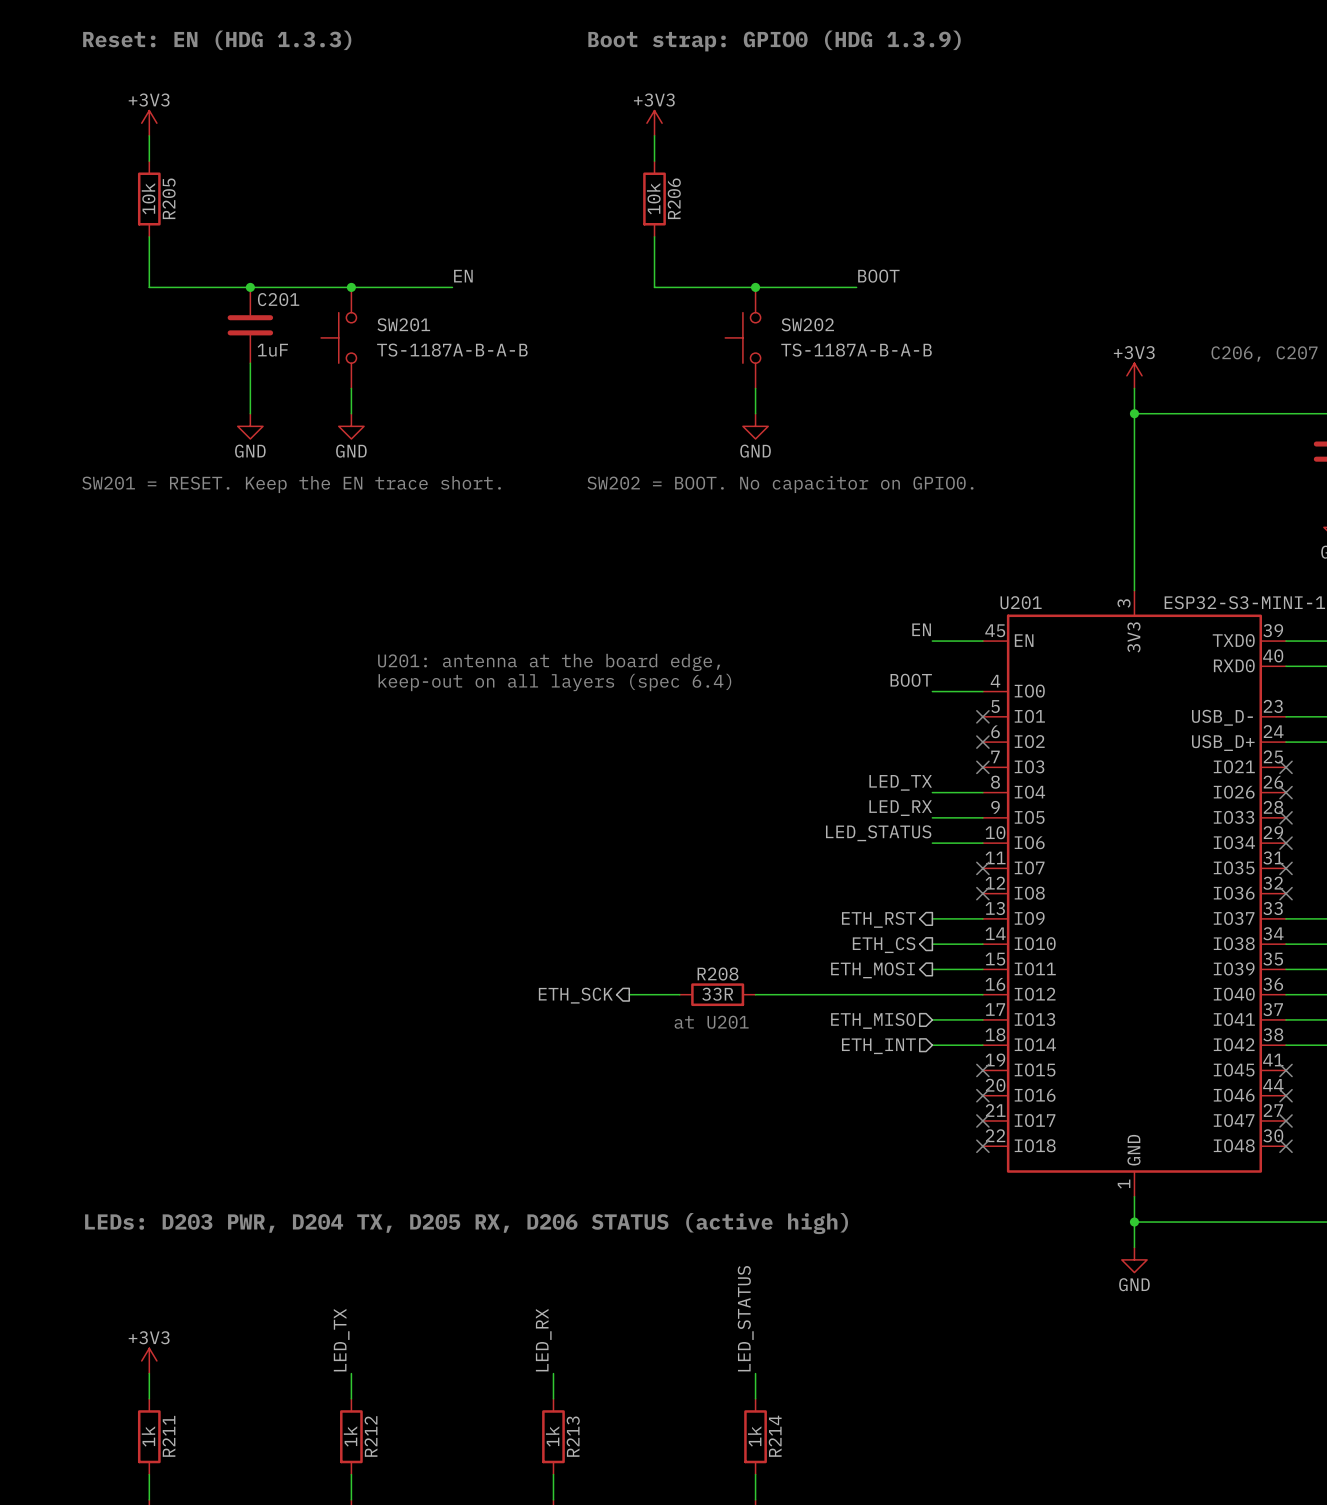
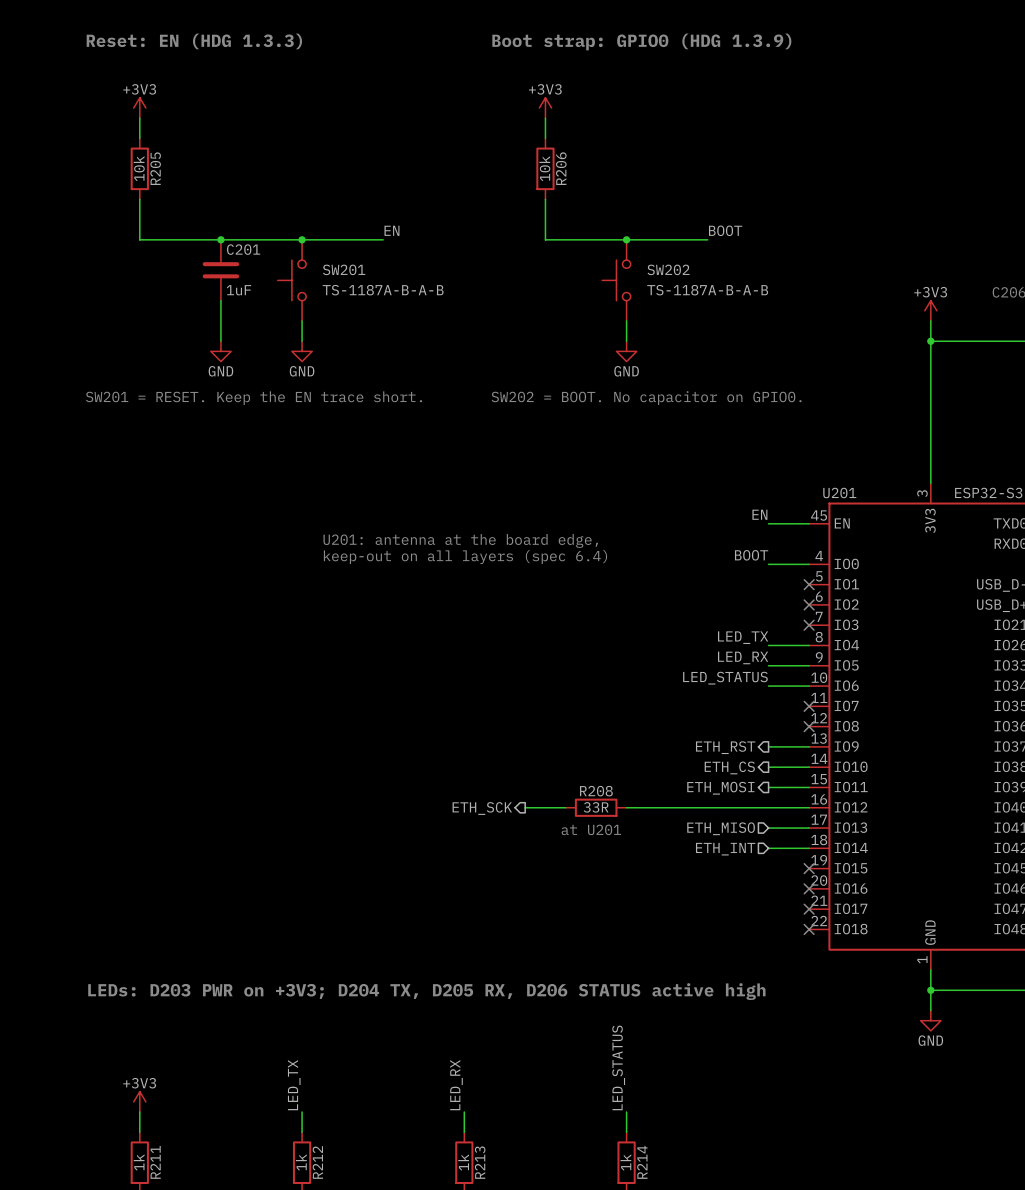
text: LEDs: D203 PWR, D204 TX, D205 RX, D206 STATUS (active high) (466, 1223) -> LEDs: D203 PWR on +3V3; D204 TX, D205 RX, D206 STATUS active high (426, 991)

